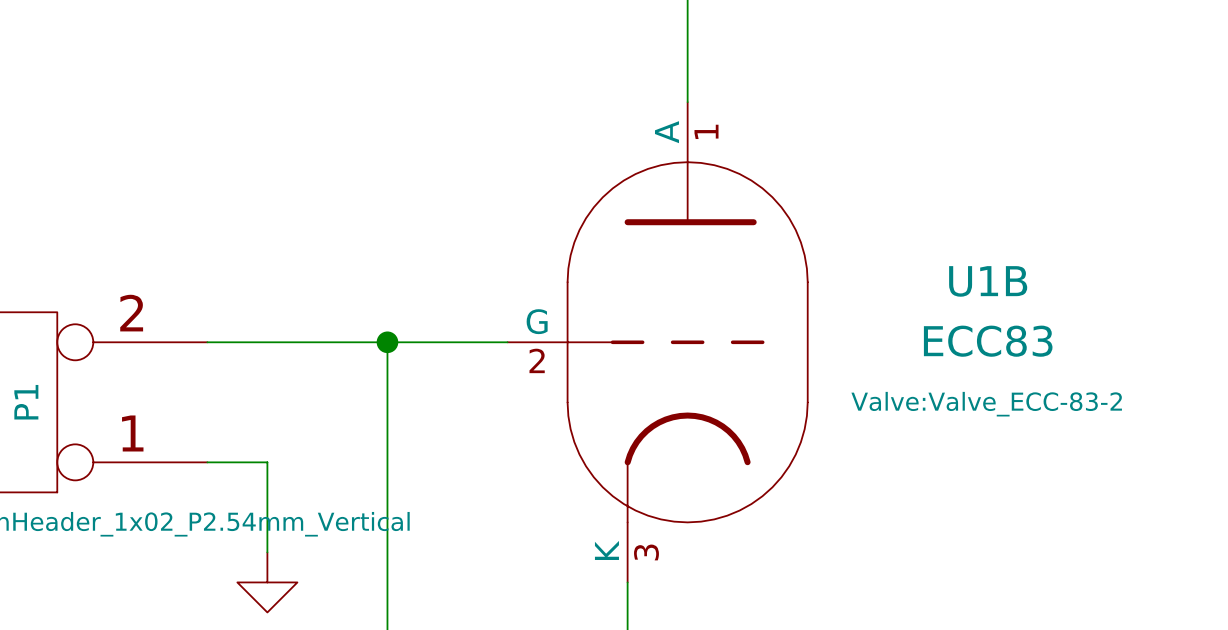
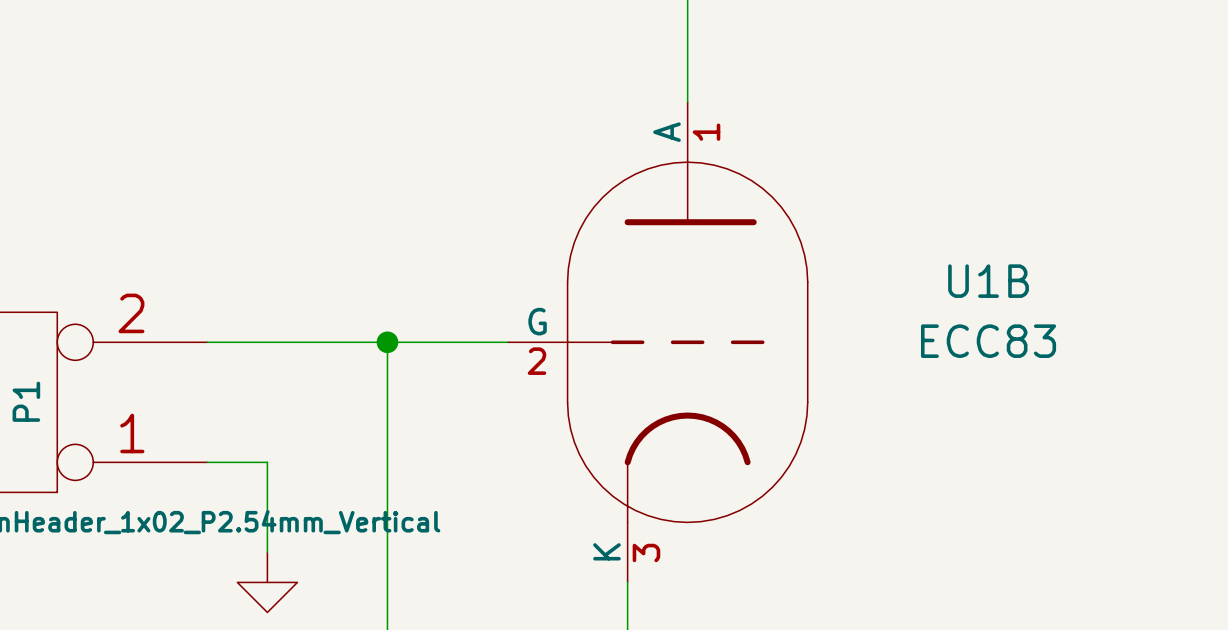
U1B text: Valve:Valve_ECC-83-2 (986, 404) -> none

